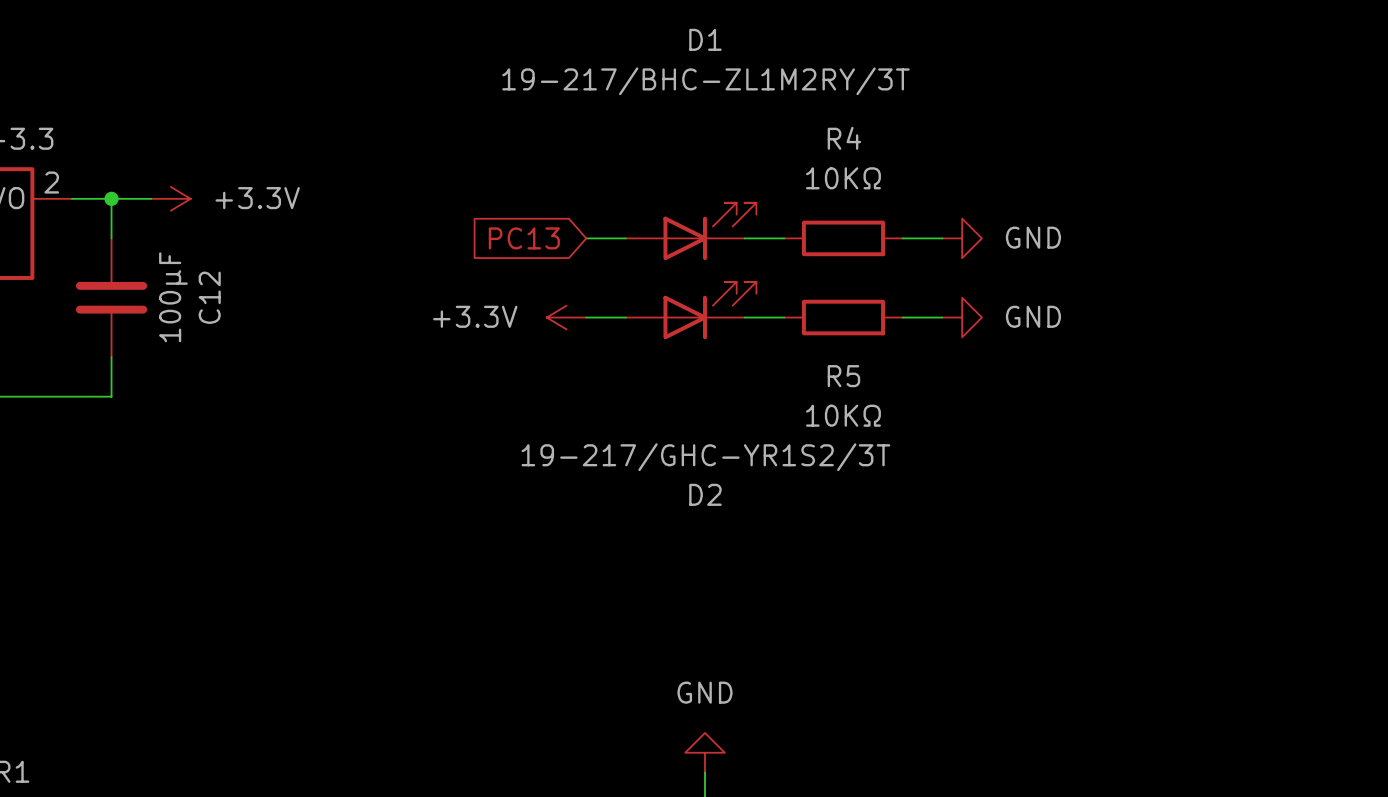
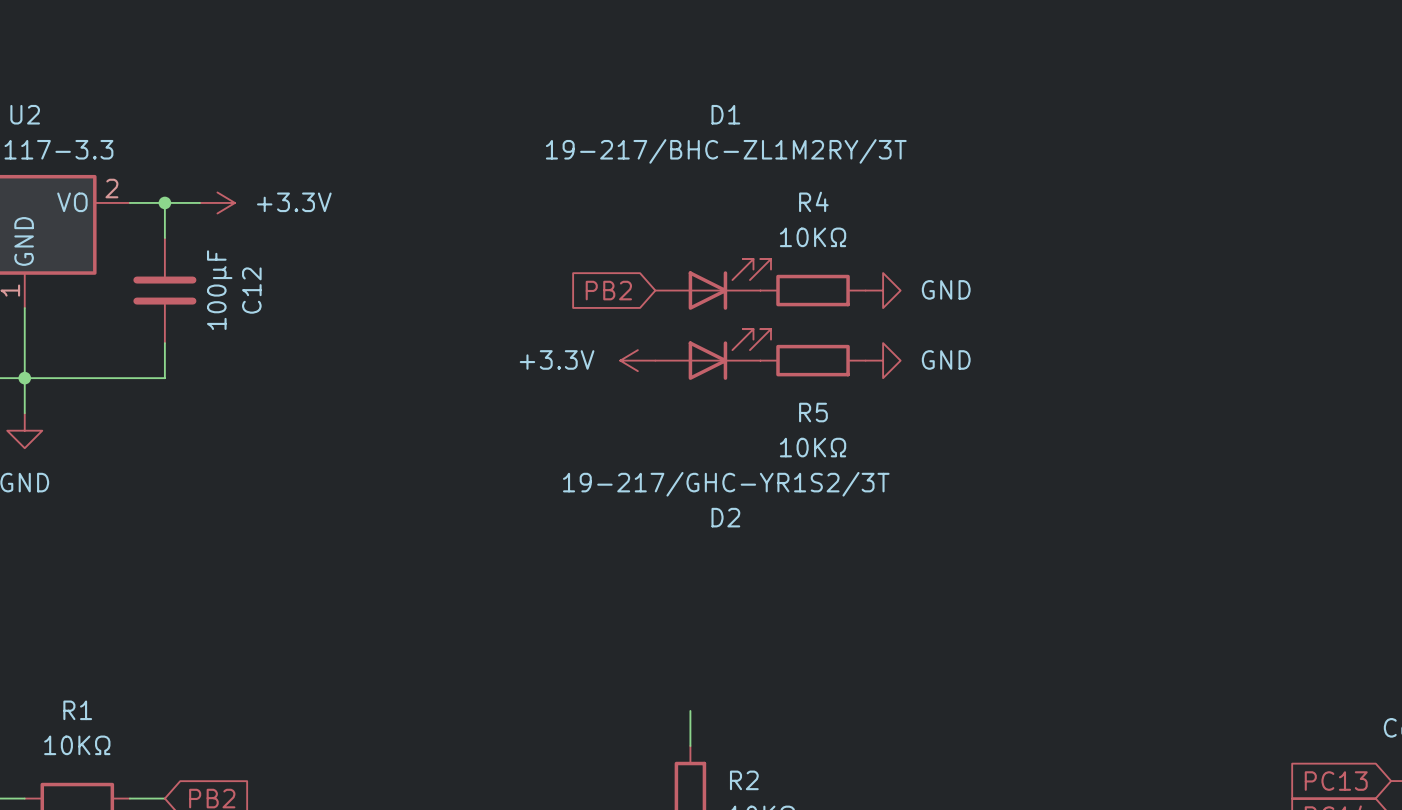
D1 position: (691, 231) -> (713, 284)
global label: PC13 (524, 238) -> none
wire: (586, 238) (625, 238) -> none
wire: (744, 238) (784, 238) -> none
R4 position: (843, 238) -> (813, 290)
wire: (902, 238) (942, 238) -> none
power symbol: GND (962, 238) -> none
global label: none -> PB2 (608, 290)
power symbol: none -> GND (883, 290)
D2 position: (691, 310) -> (713, 354)
power symbol position: +3.3V (566, 317) -> +3.3V (637, 360)
wire: (744, 317) (784, 317) -> none
R5 position: (843, 317) -> (813, 360)
wire: (902, 317) (942, 317) -> none
power symbol: GND (962, 317) -> none
power symbol: none -> GND (883, 360)
power symbol: GND (704, 752) -> none

